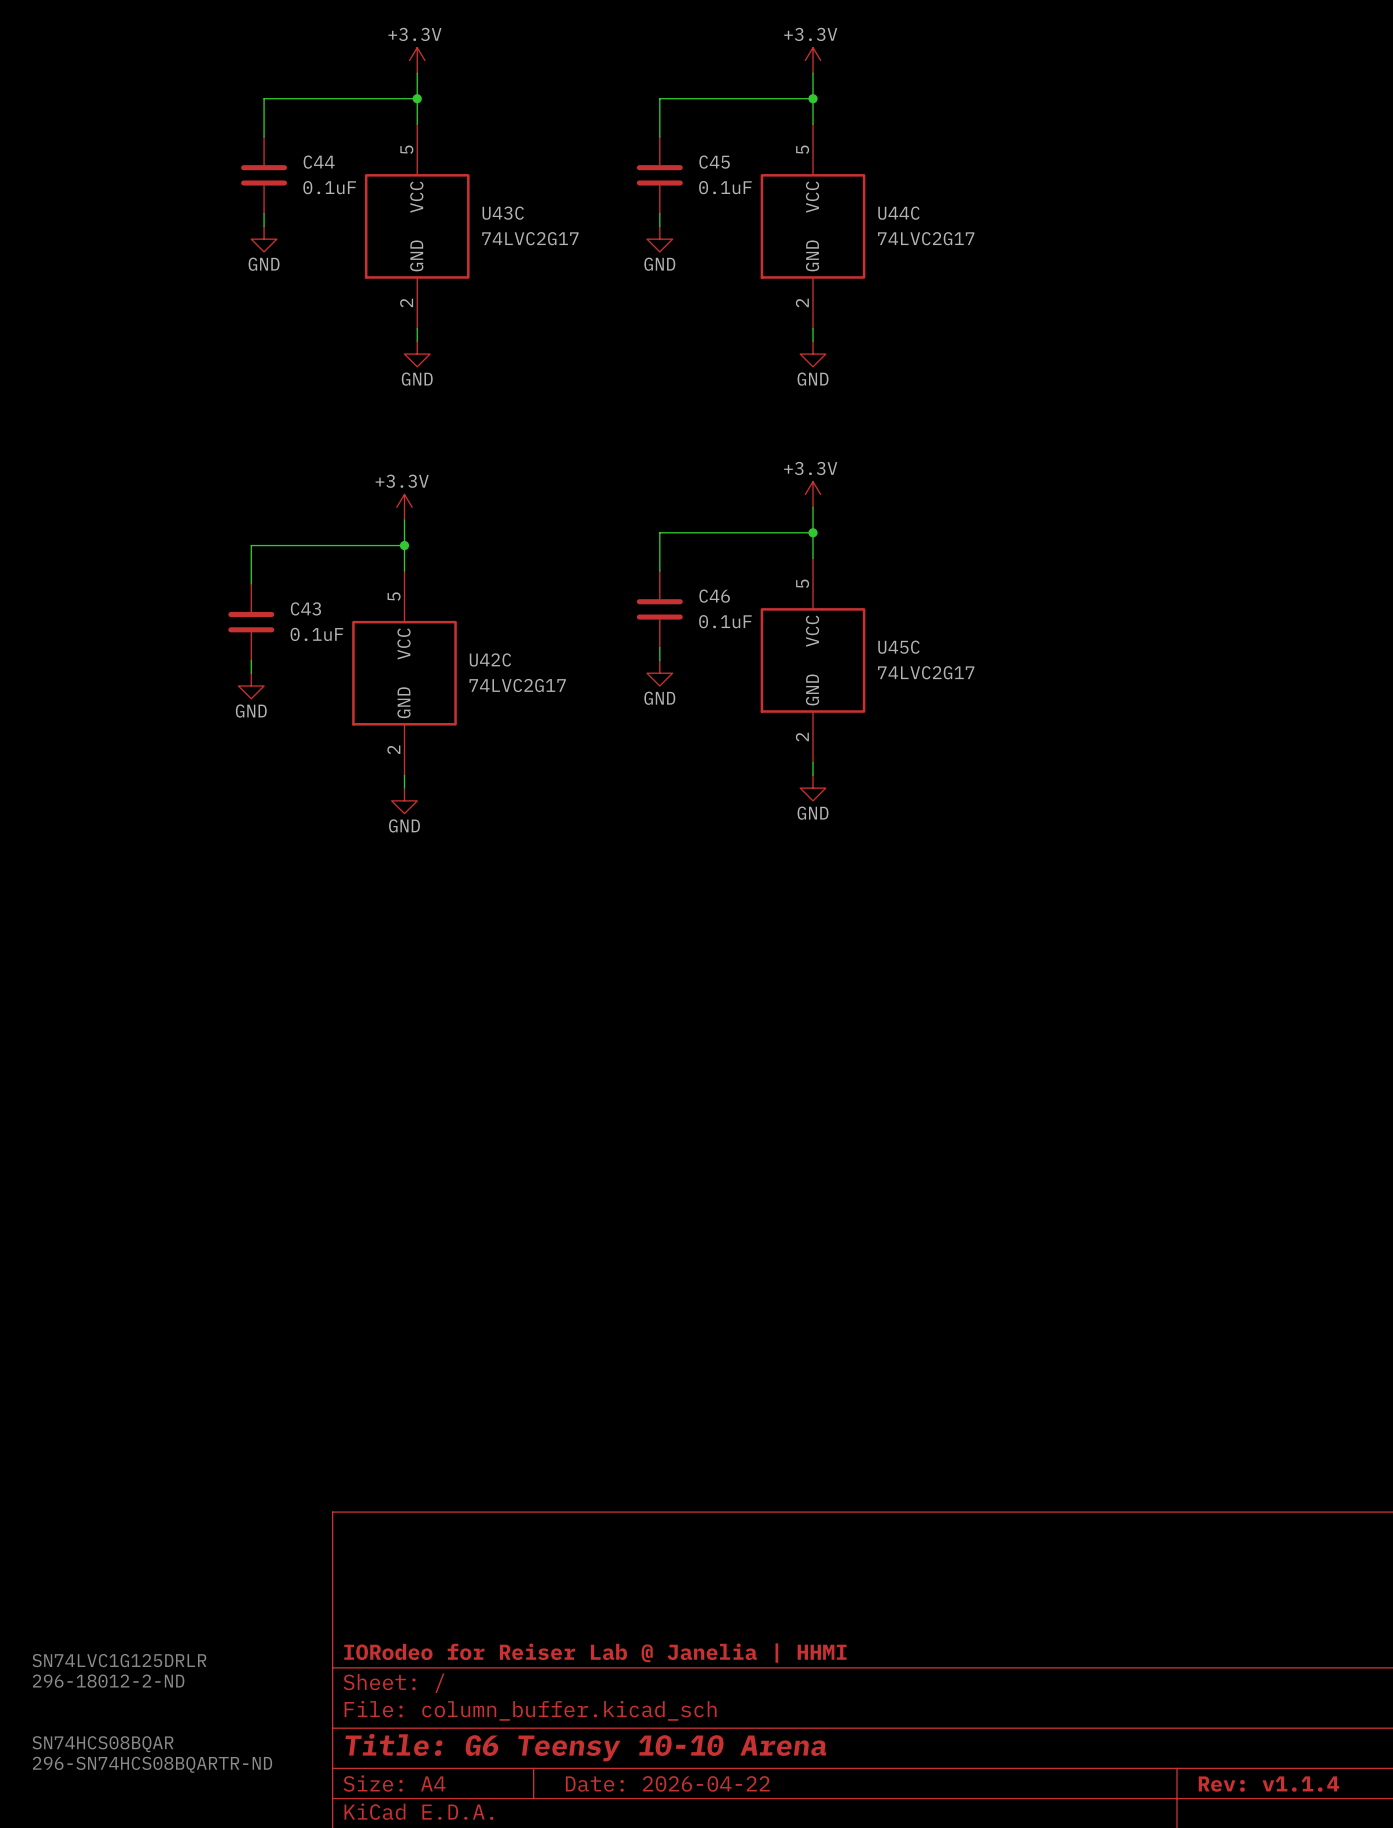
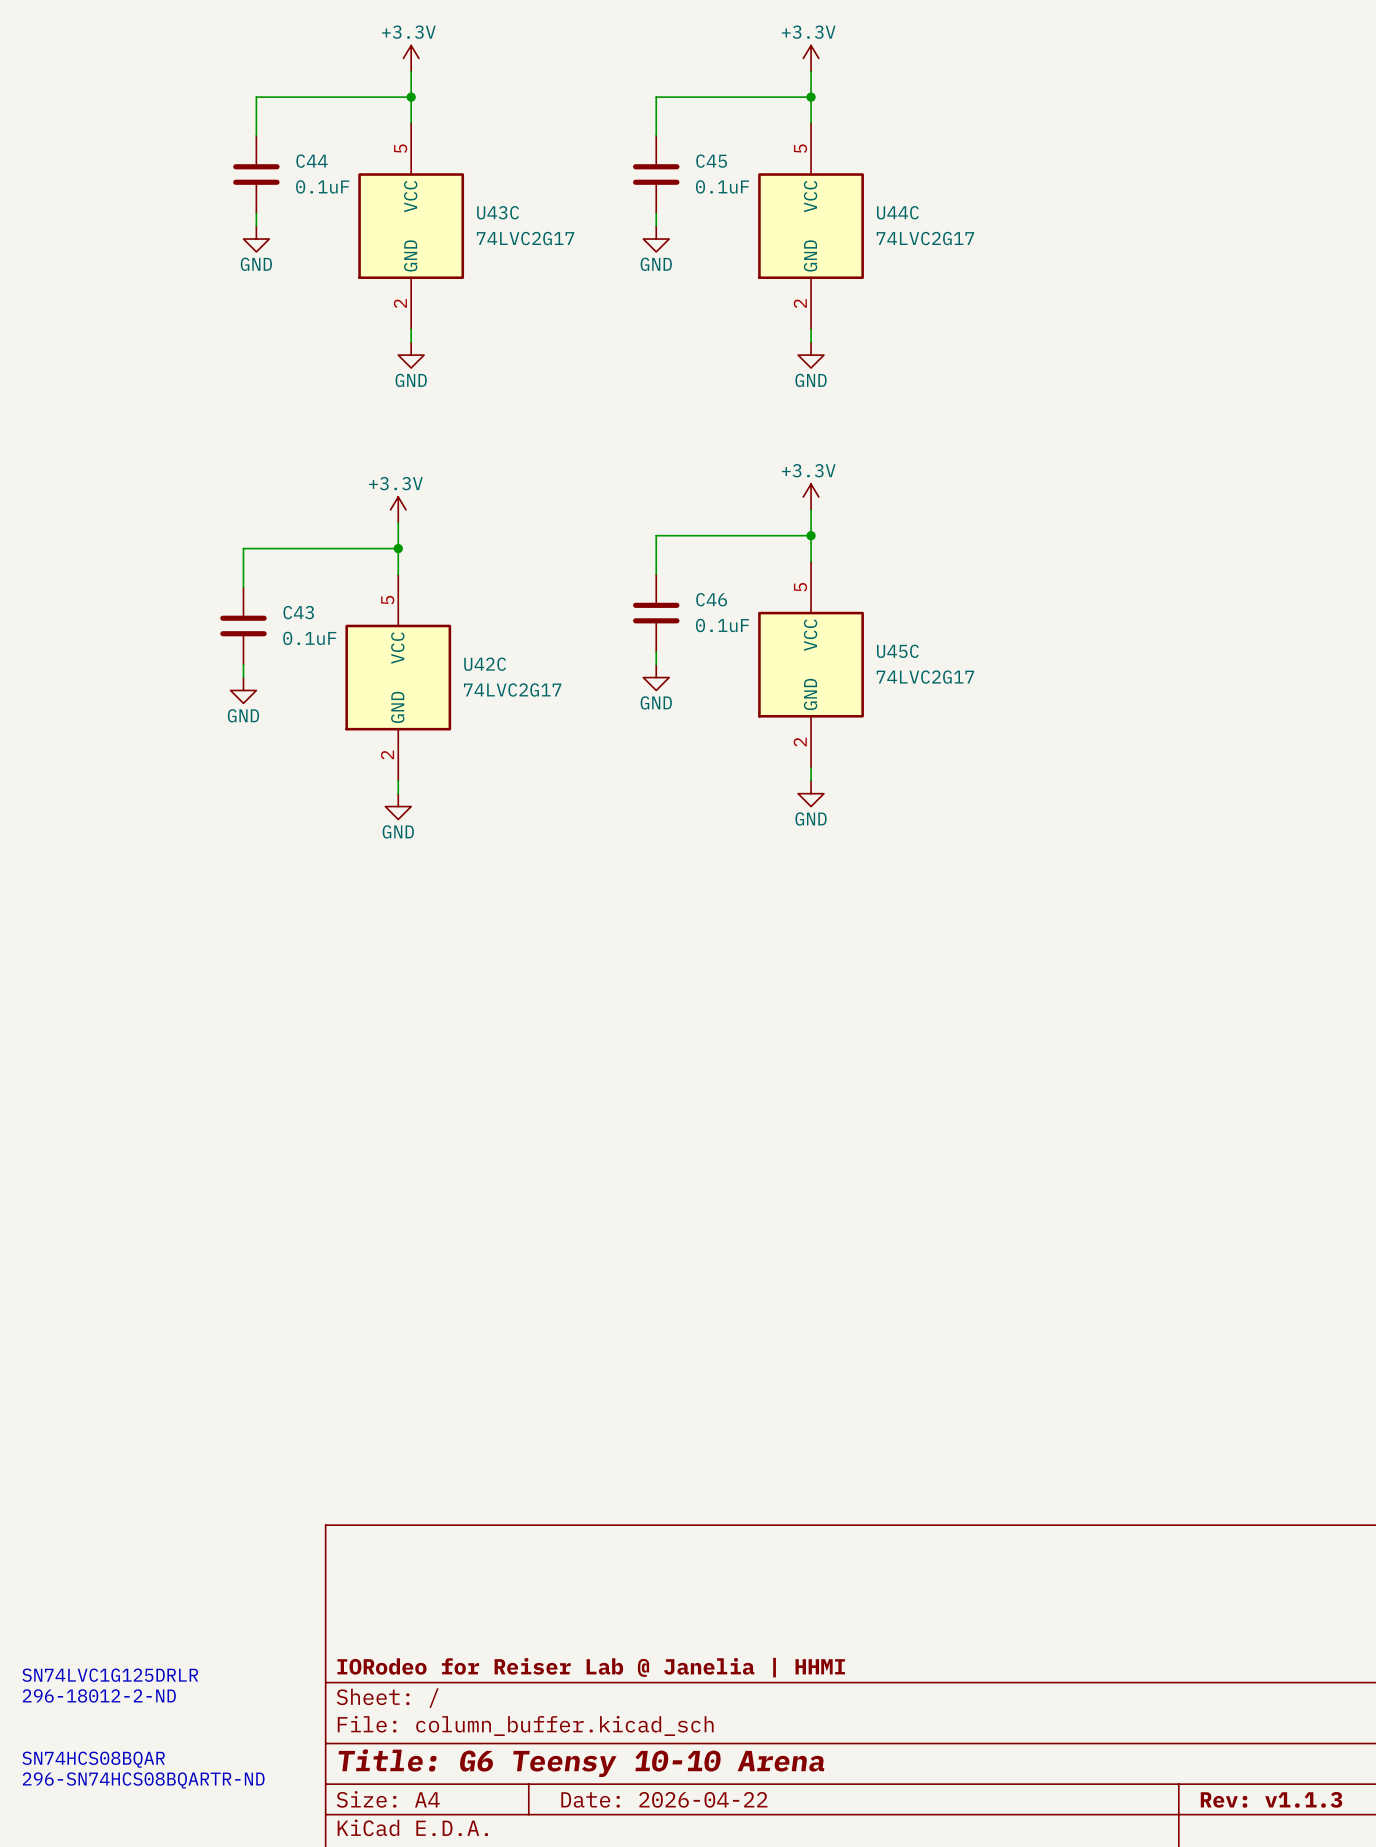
title block: Rev: v1.1.4 (1268, 1784) -> Rev: v1.1.3 (1271, 1799)

